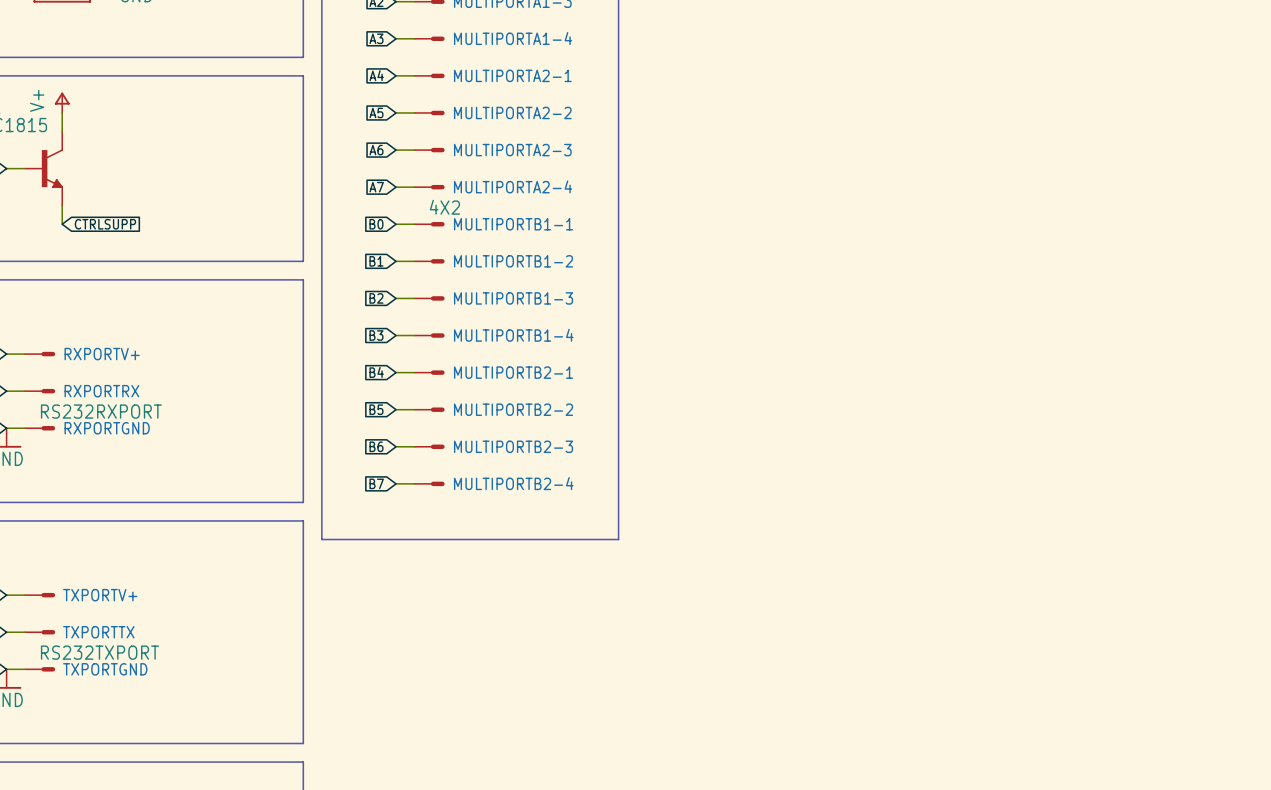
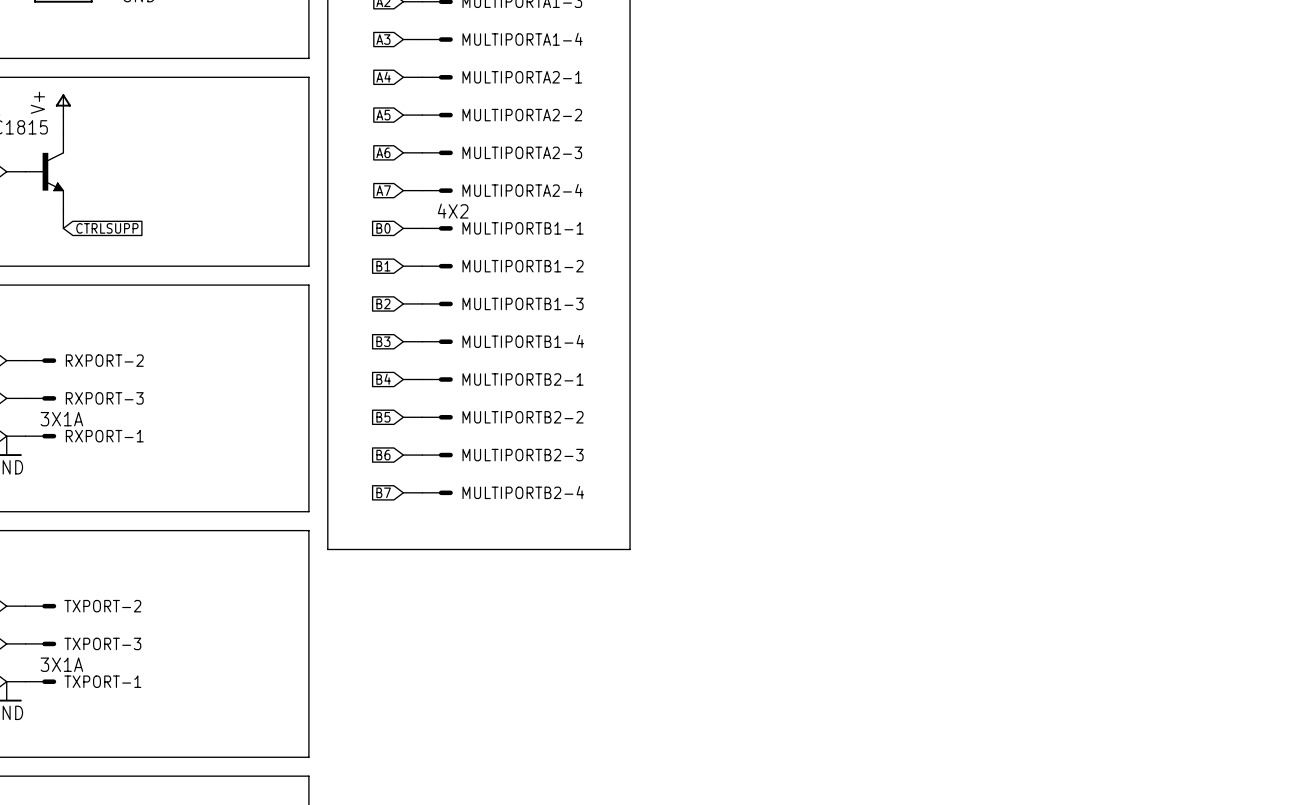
RXPORTV+ name: RXPORTV+ (102, 354) -> RXPORT-2 (104, 360)
RXPORTRX name: RXPORTRX (101, 391) -> RXPORT-3 (104, 398)
RXPORTGND value: RS232RXPORT (101, 411) -> 3X1A (61, 419)
RXPORTGND name: RXPORTGND (107, 428) -> RXPORT-1 (104, 436)
TXPORTV+ name: TXPORTV+ (100, 595) -> TXPORT-2 (102, 606)
TXPORTTX name: TXPORTTX (98, 632) -> TXPORT-3 (102, 643)
TXPORTGND value: RS232TXPORT (100, 652) -> 3X1A (61, 664)
TXPORTGND name: TXPORTGND (105, 669) -> TXPORT-1 (102, 681)

